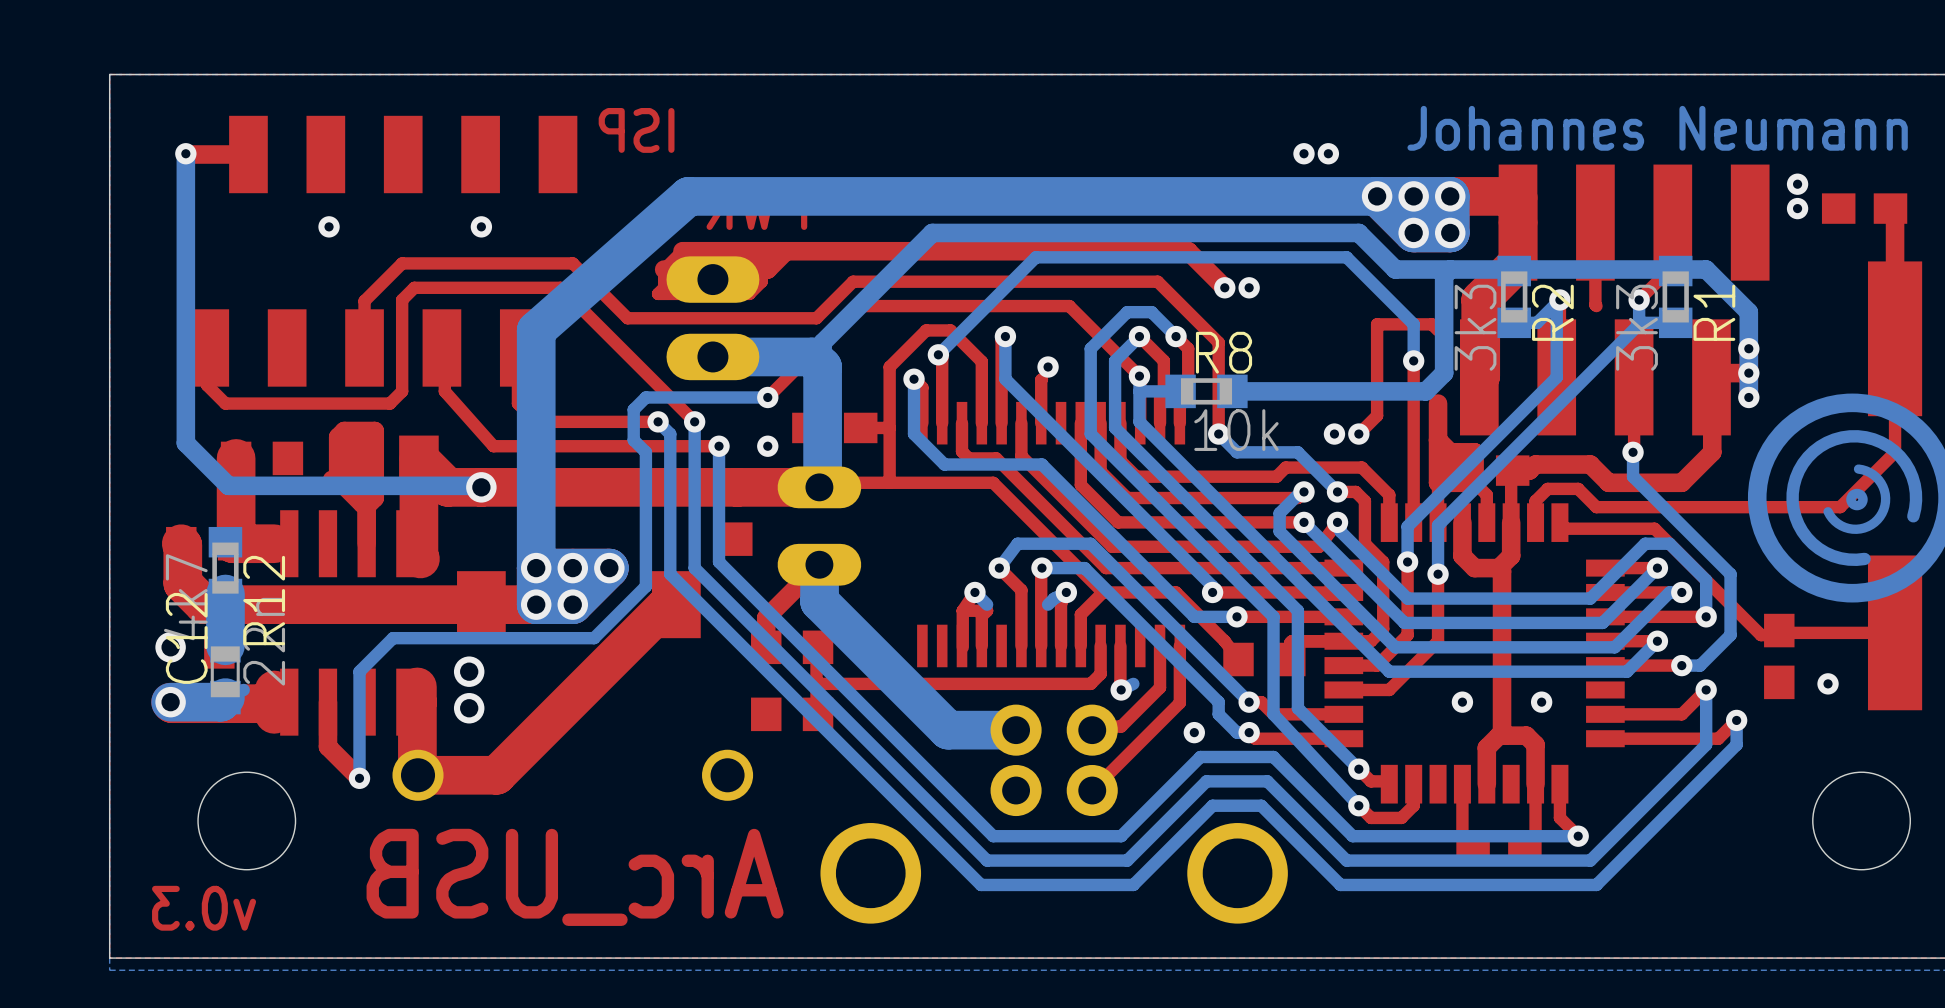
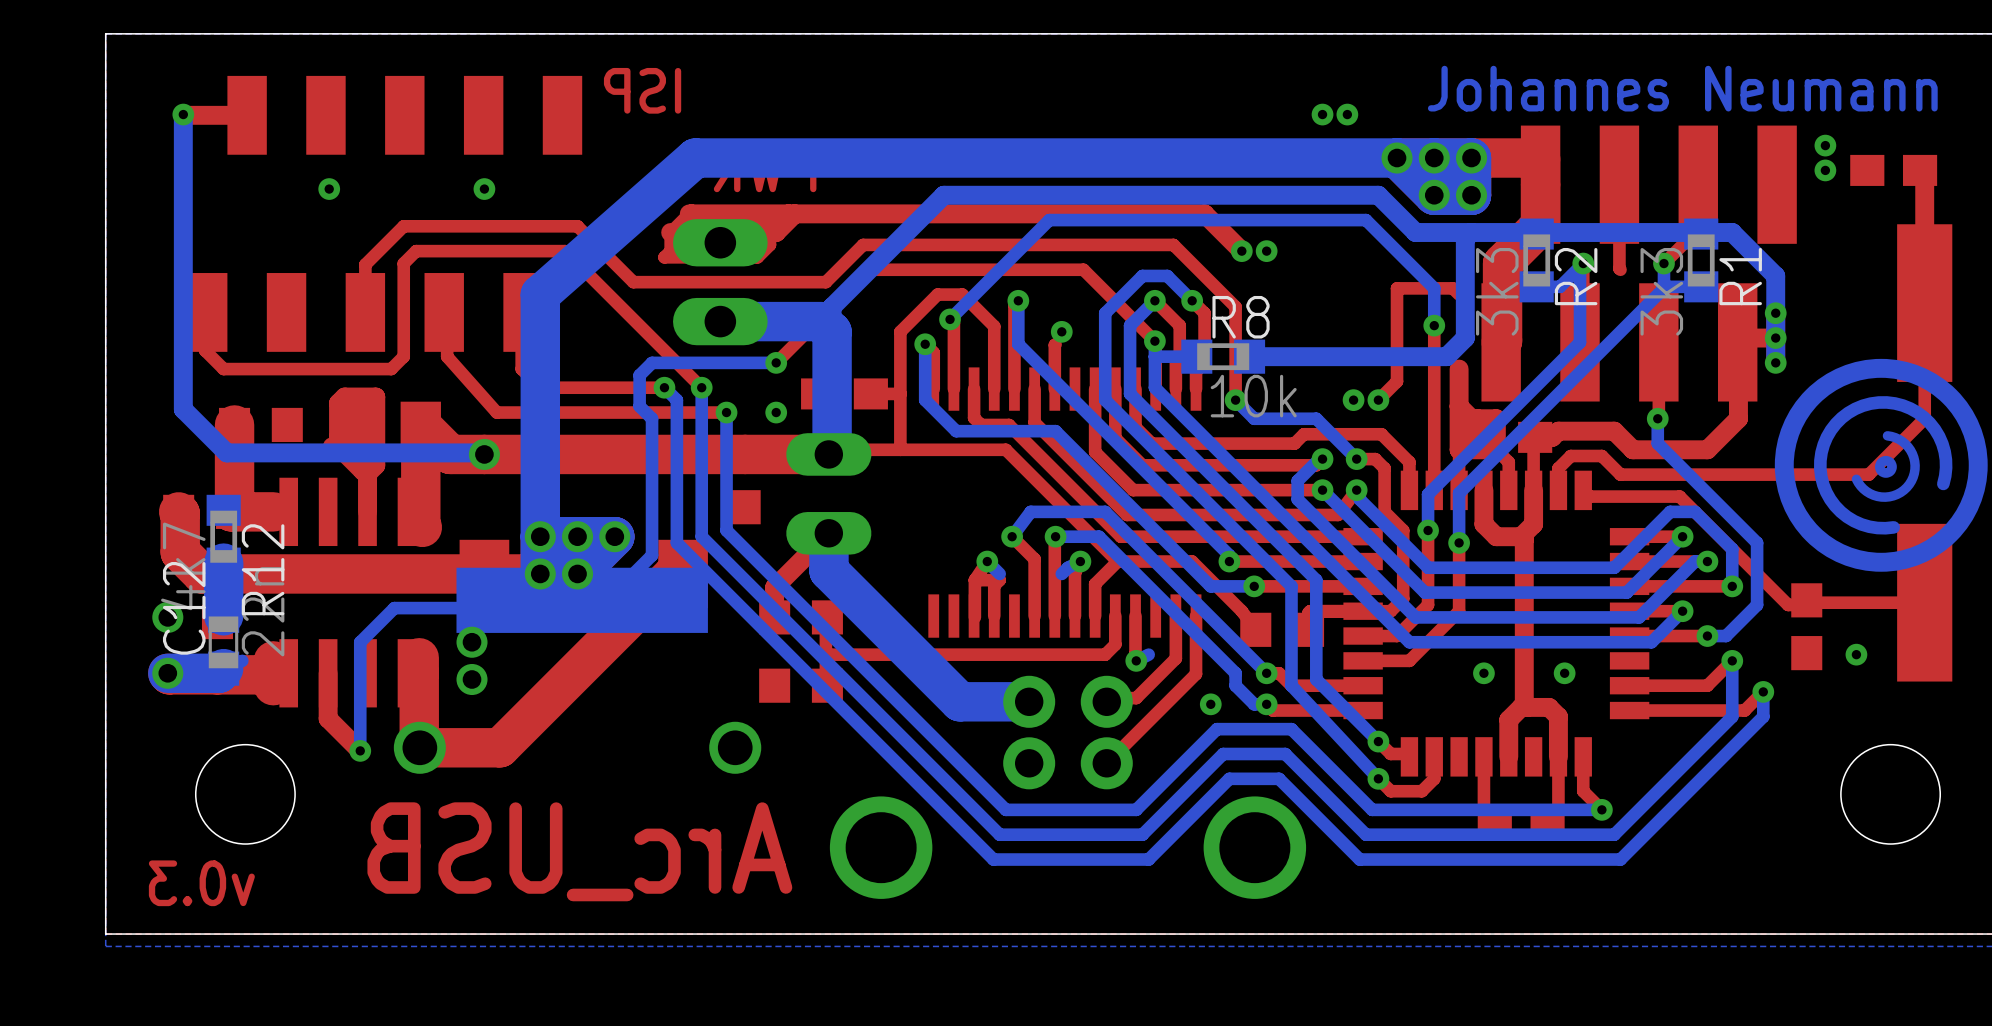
drawing: none -> [456, 567, 708, 633]

